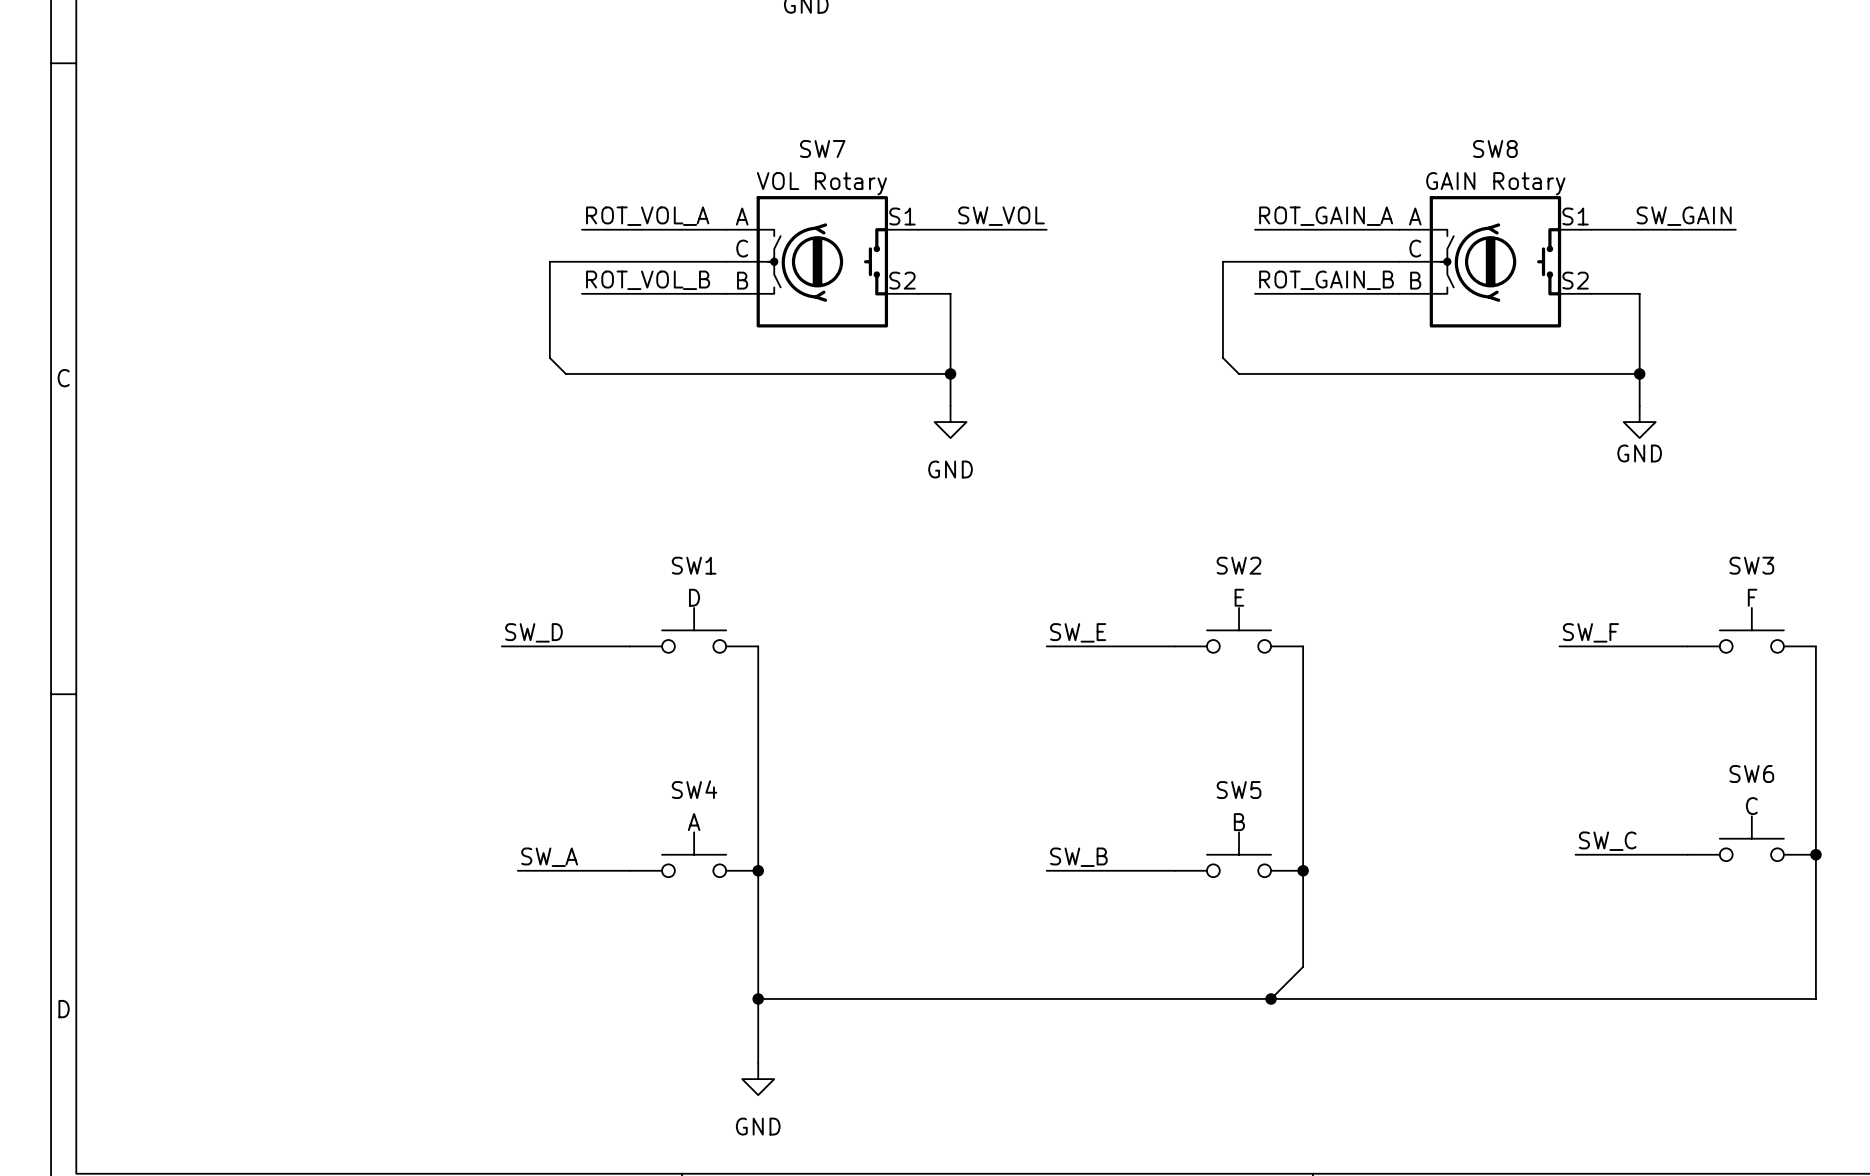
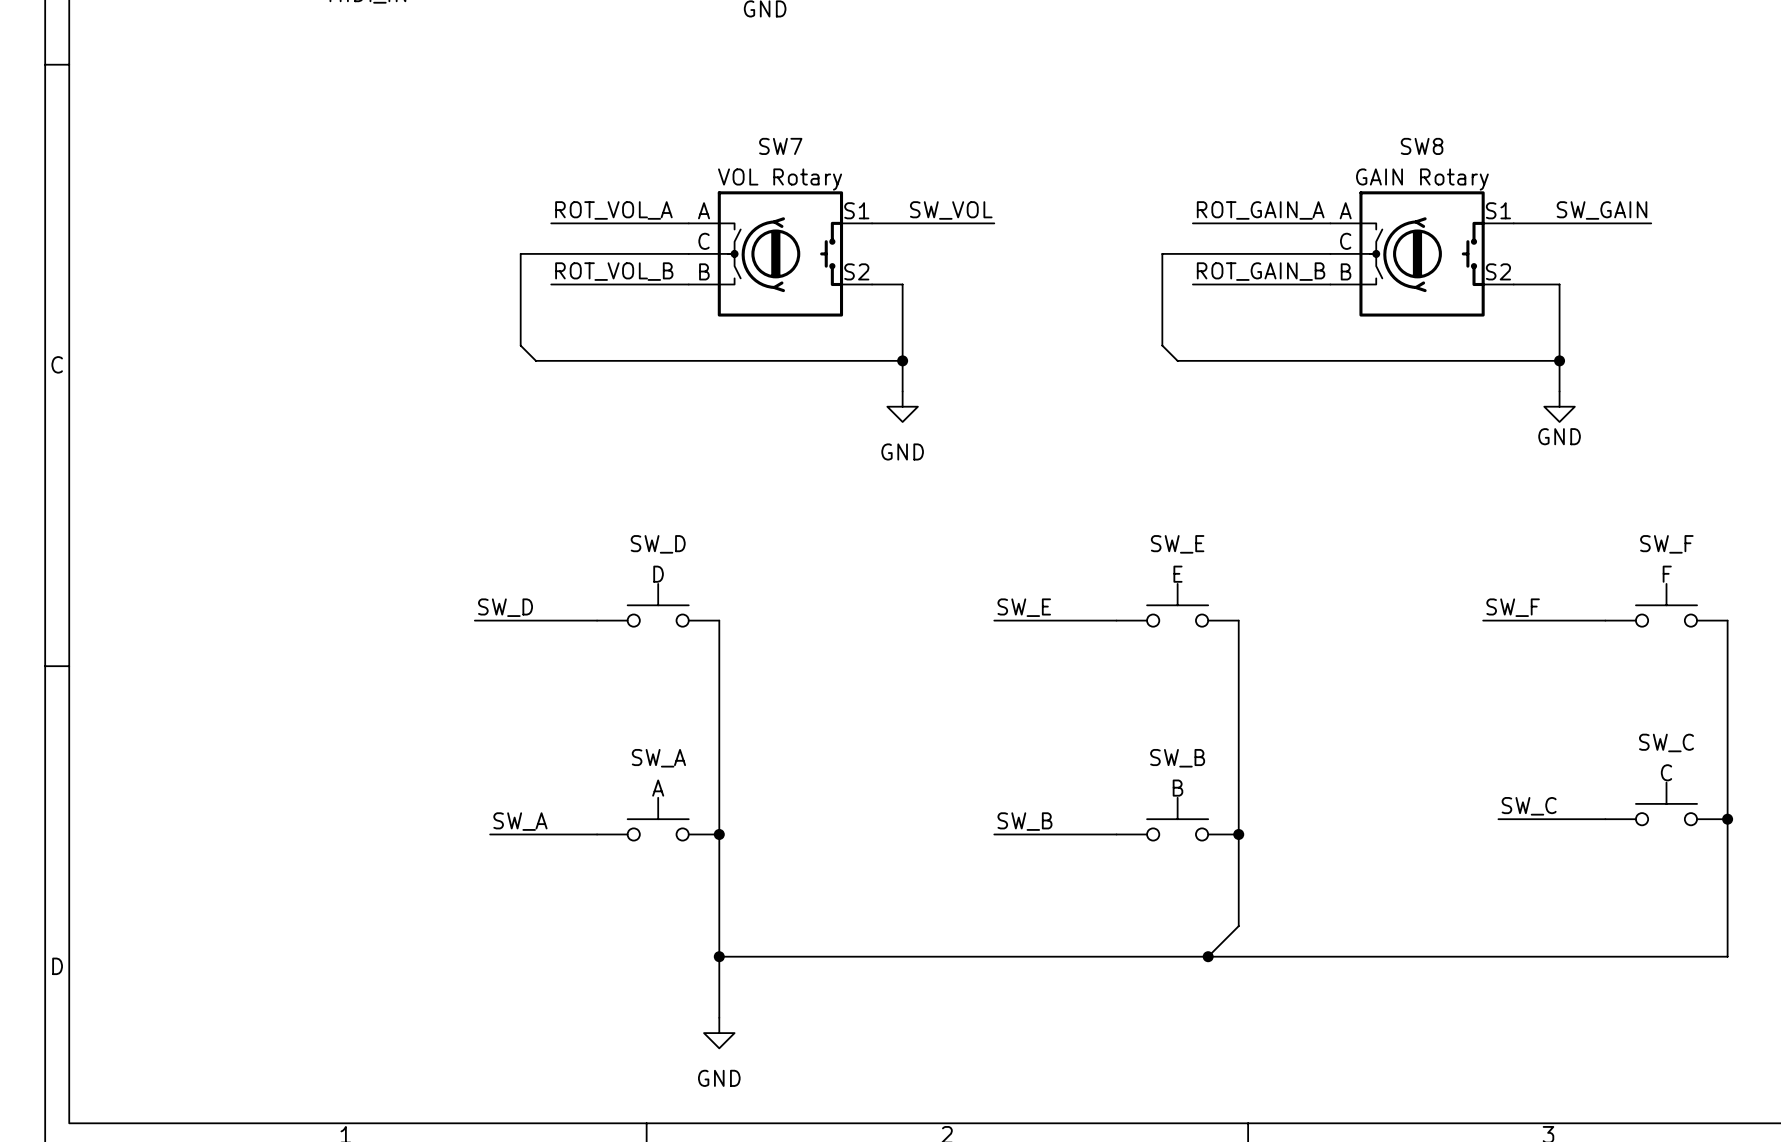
SW1 name: SW1 (694, 565) -> SW_D (658, 544)
SW2 name: SW2 (1239, 565) -> SW_E (1177, 544)
SW3 name: SW3 (1751, 565) -> SW_F (1666, 544)
SW6 name: SW6 (1751, 774) -> SW_C (1666, 742)
SW4 name: SW4 (694, 789) -> SW_A (658, 758)
SW5 name: SW5 (1239, 790) -> SW_B (1177, 758)

